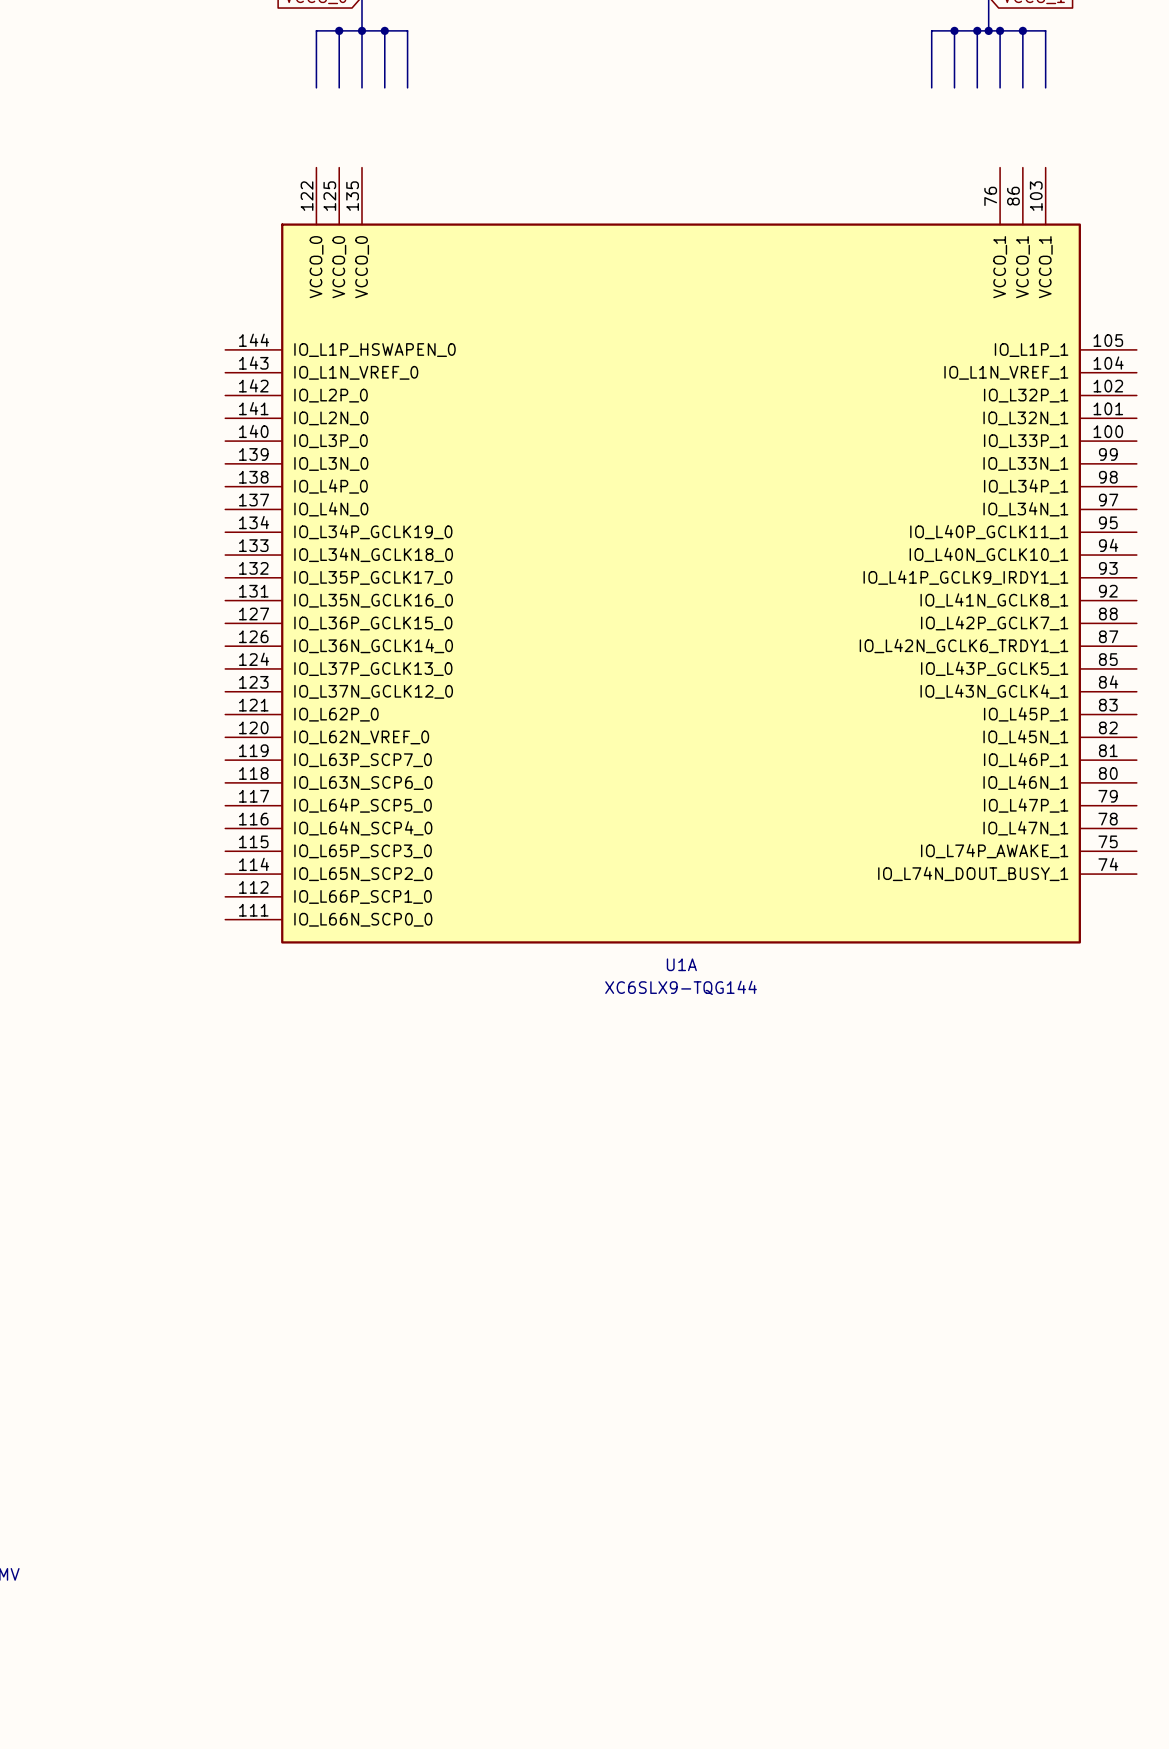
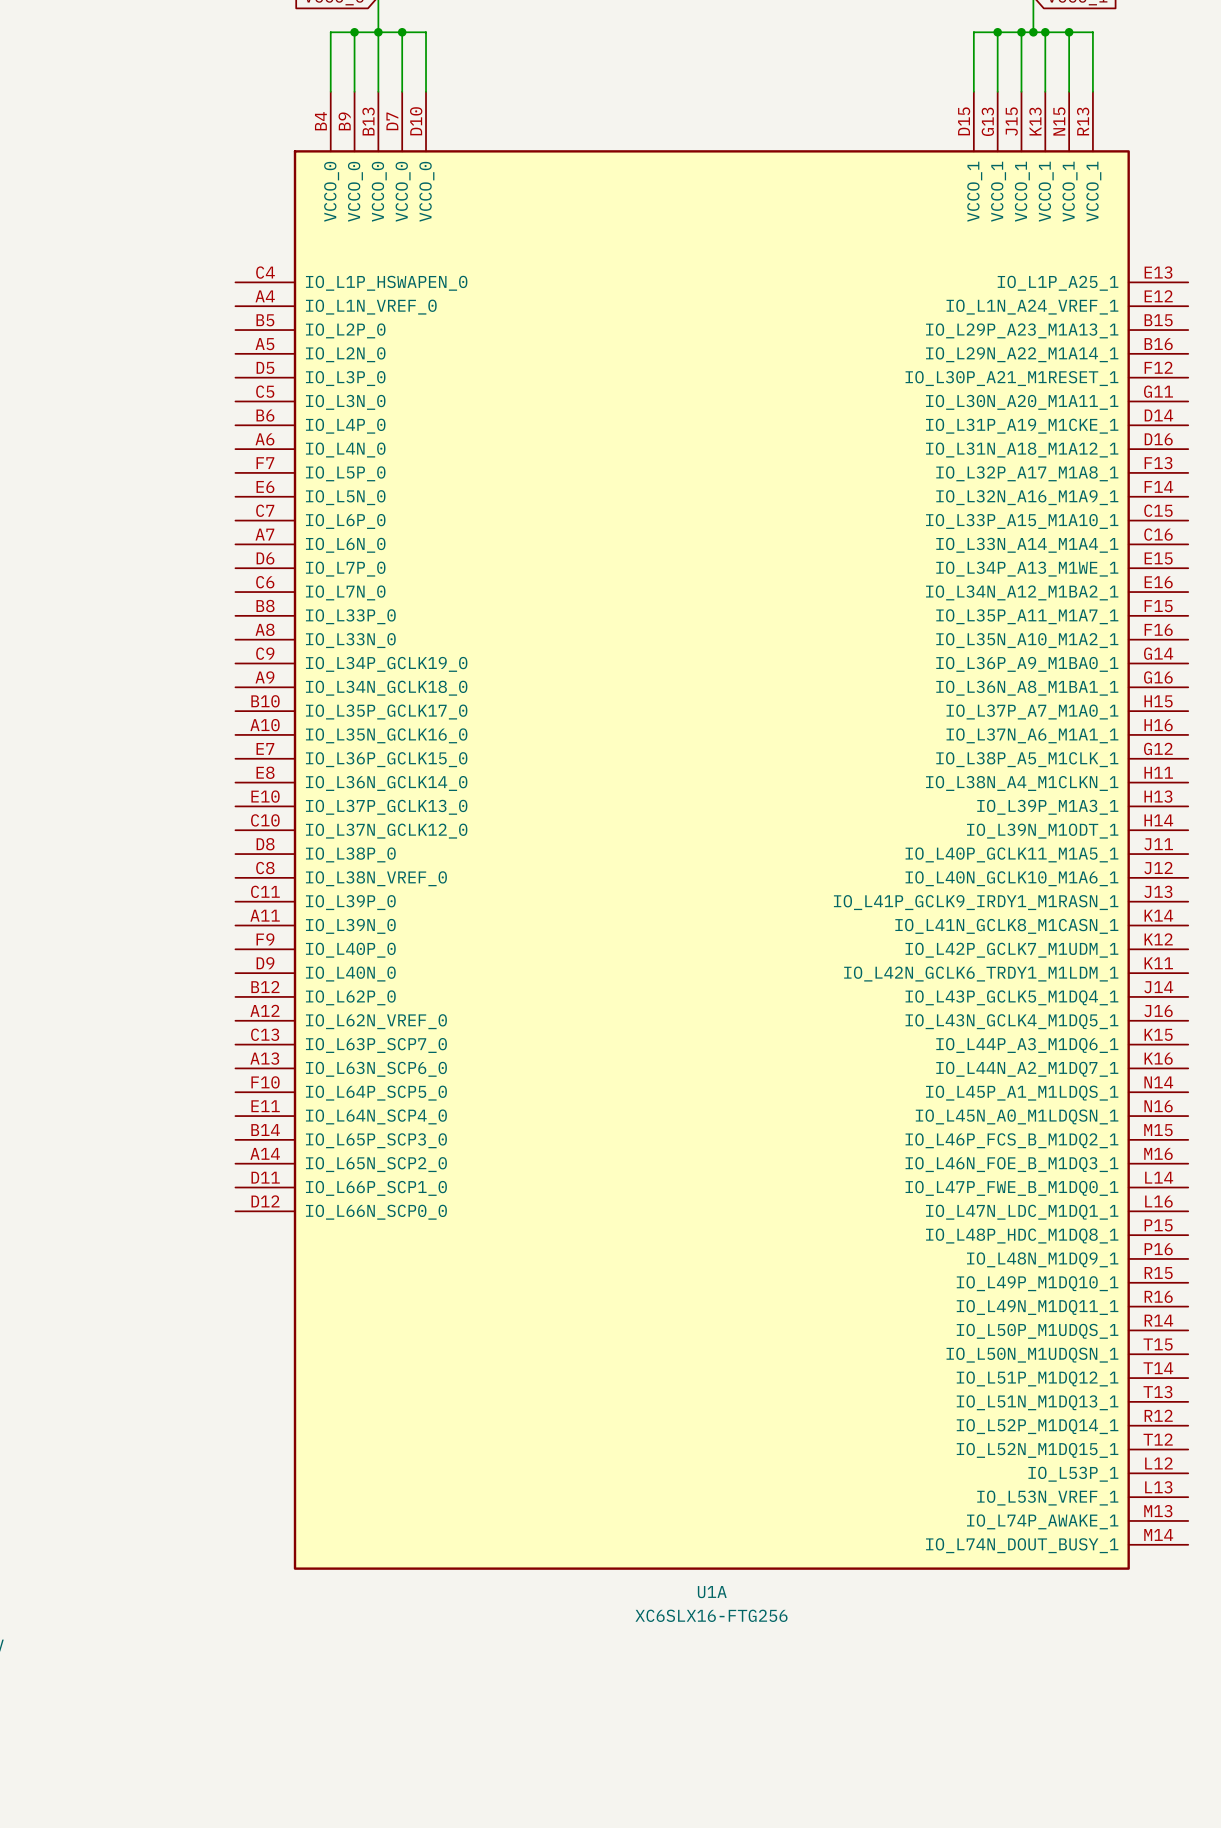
U1A symbol: [225, 167, 1137, 944] -> [235, 91, 1189, 1570]
U1A name position: U1A (681, 964) -> U1A (712, 1592)
U1A value: XC6SLX9-TQG144 (681, 987) -> XC6SLX16-FTG256 (711, 1615)

